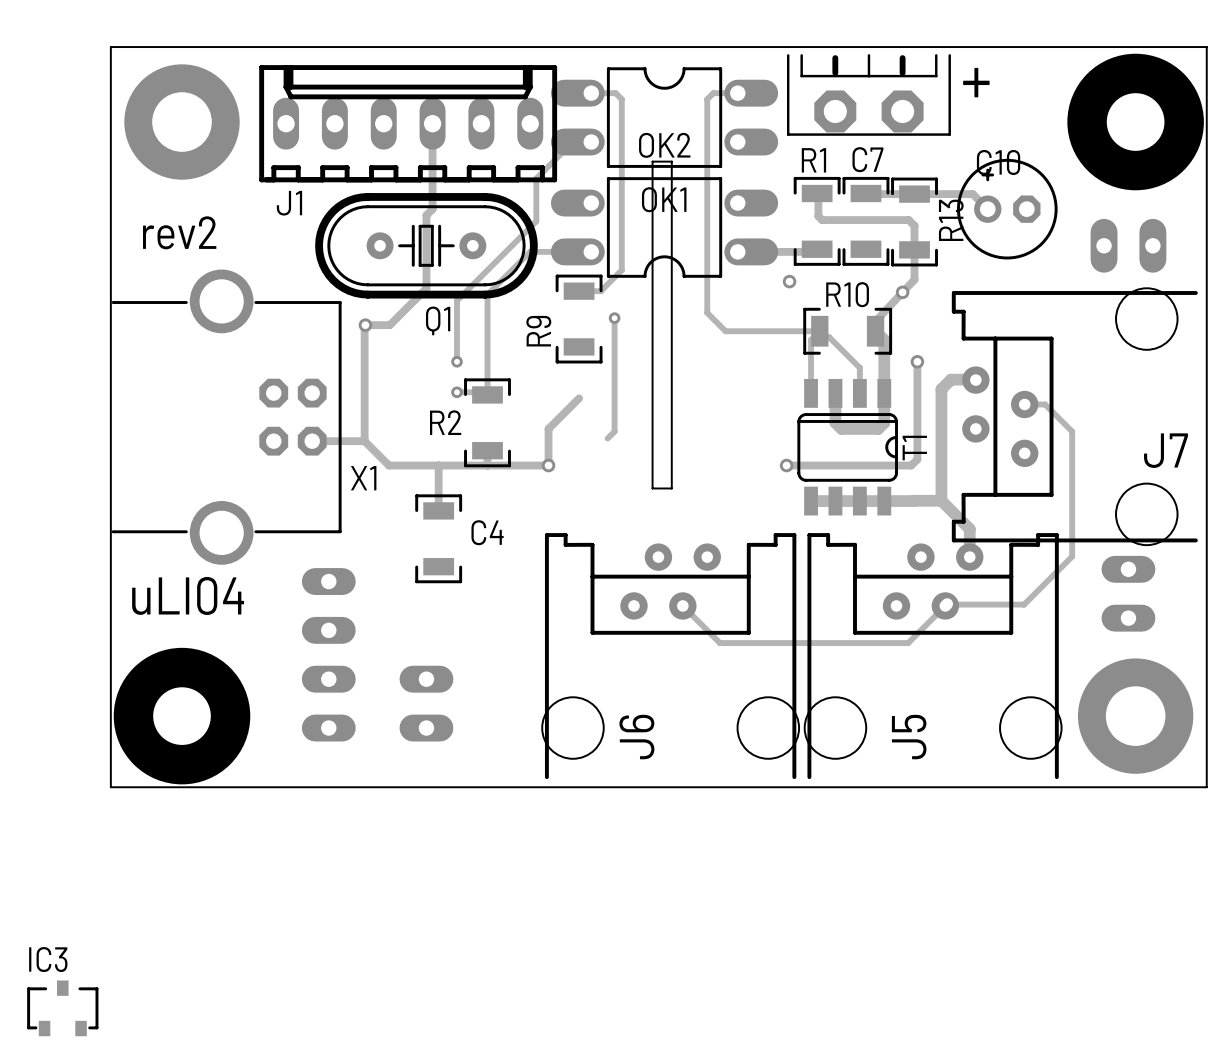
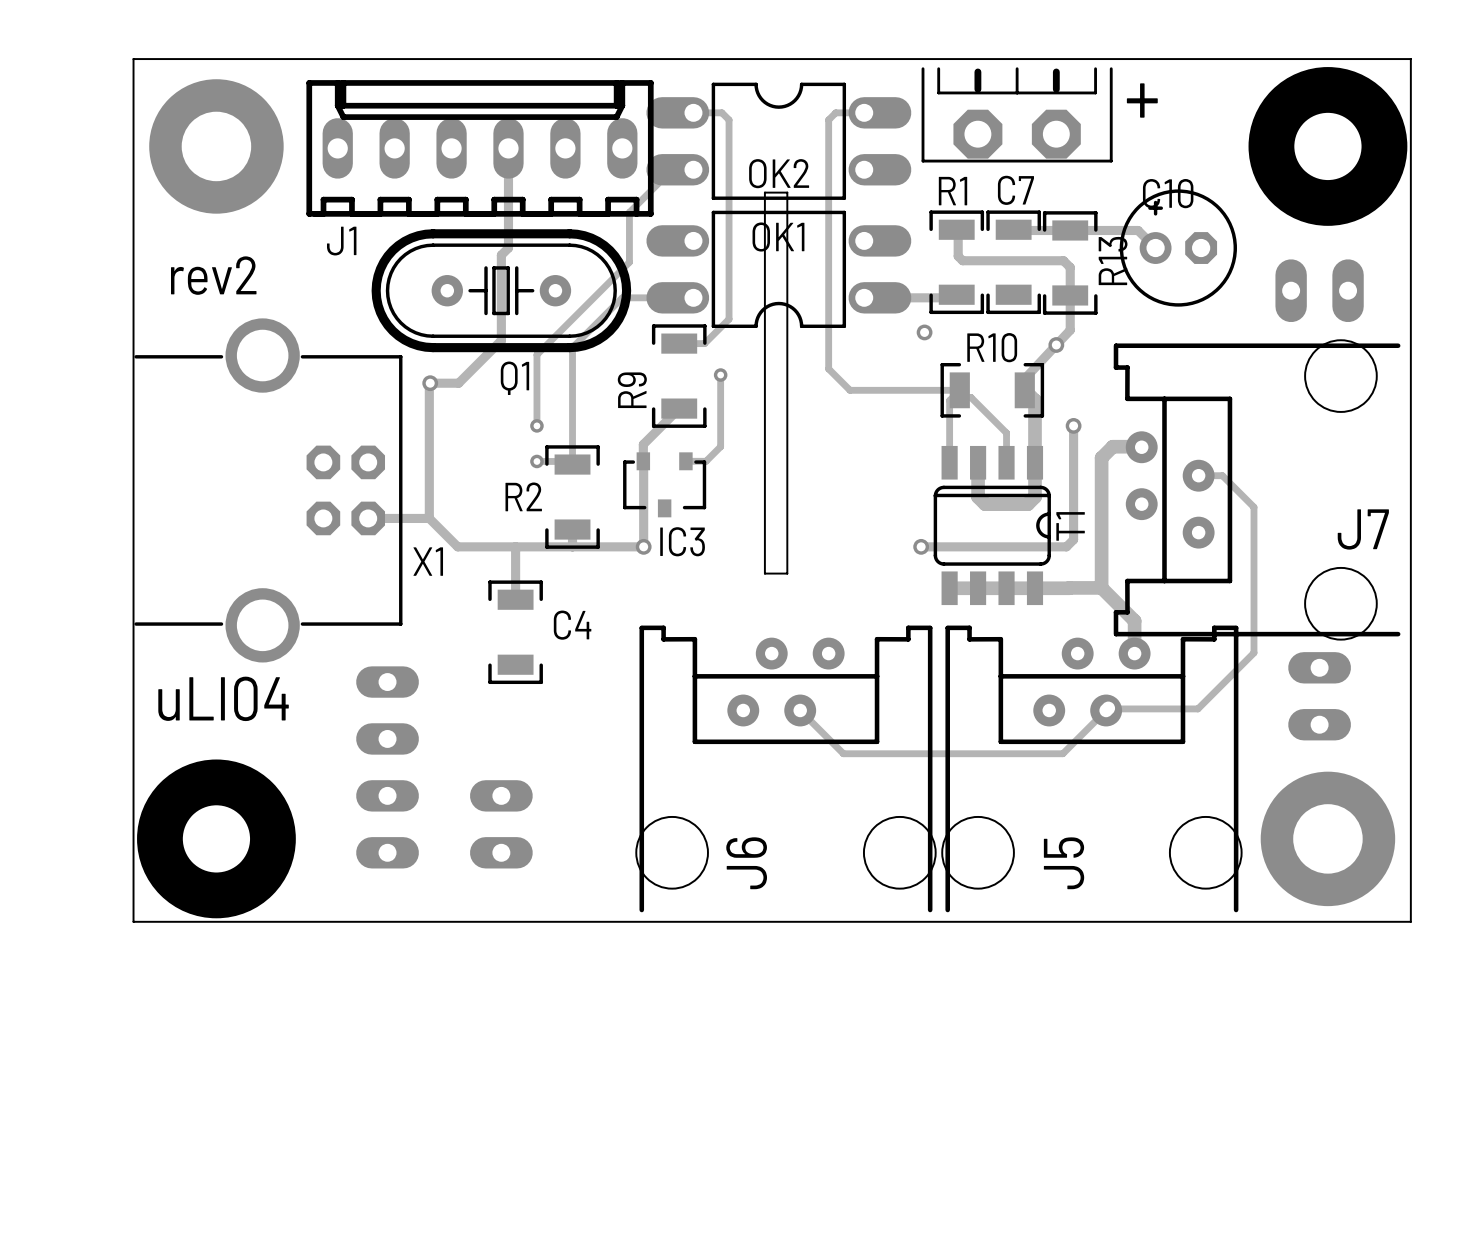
track: (614, 379) (614, 431) (607, 438) -> (720, 446) (706, 461) (685, 461)
track: (579, 398) (548, 428) -> (679, 408) (643, 444) (643, 504)
IC3 rotation: 0° (62, 1008) -> 180° (664, 484)
IC3 position: (62, 1008) -> (664, 484)

